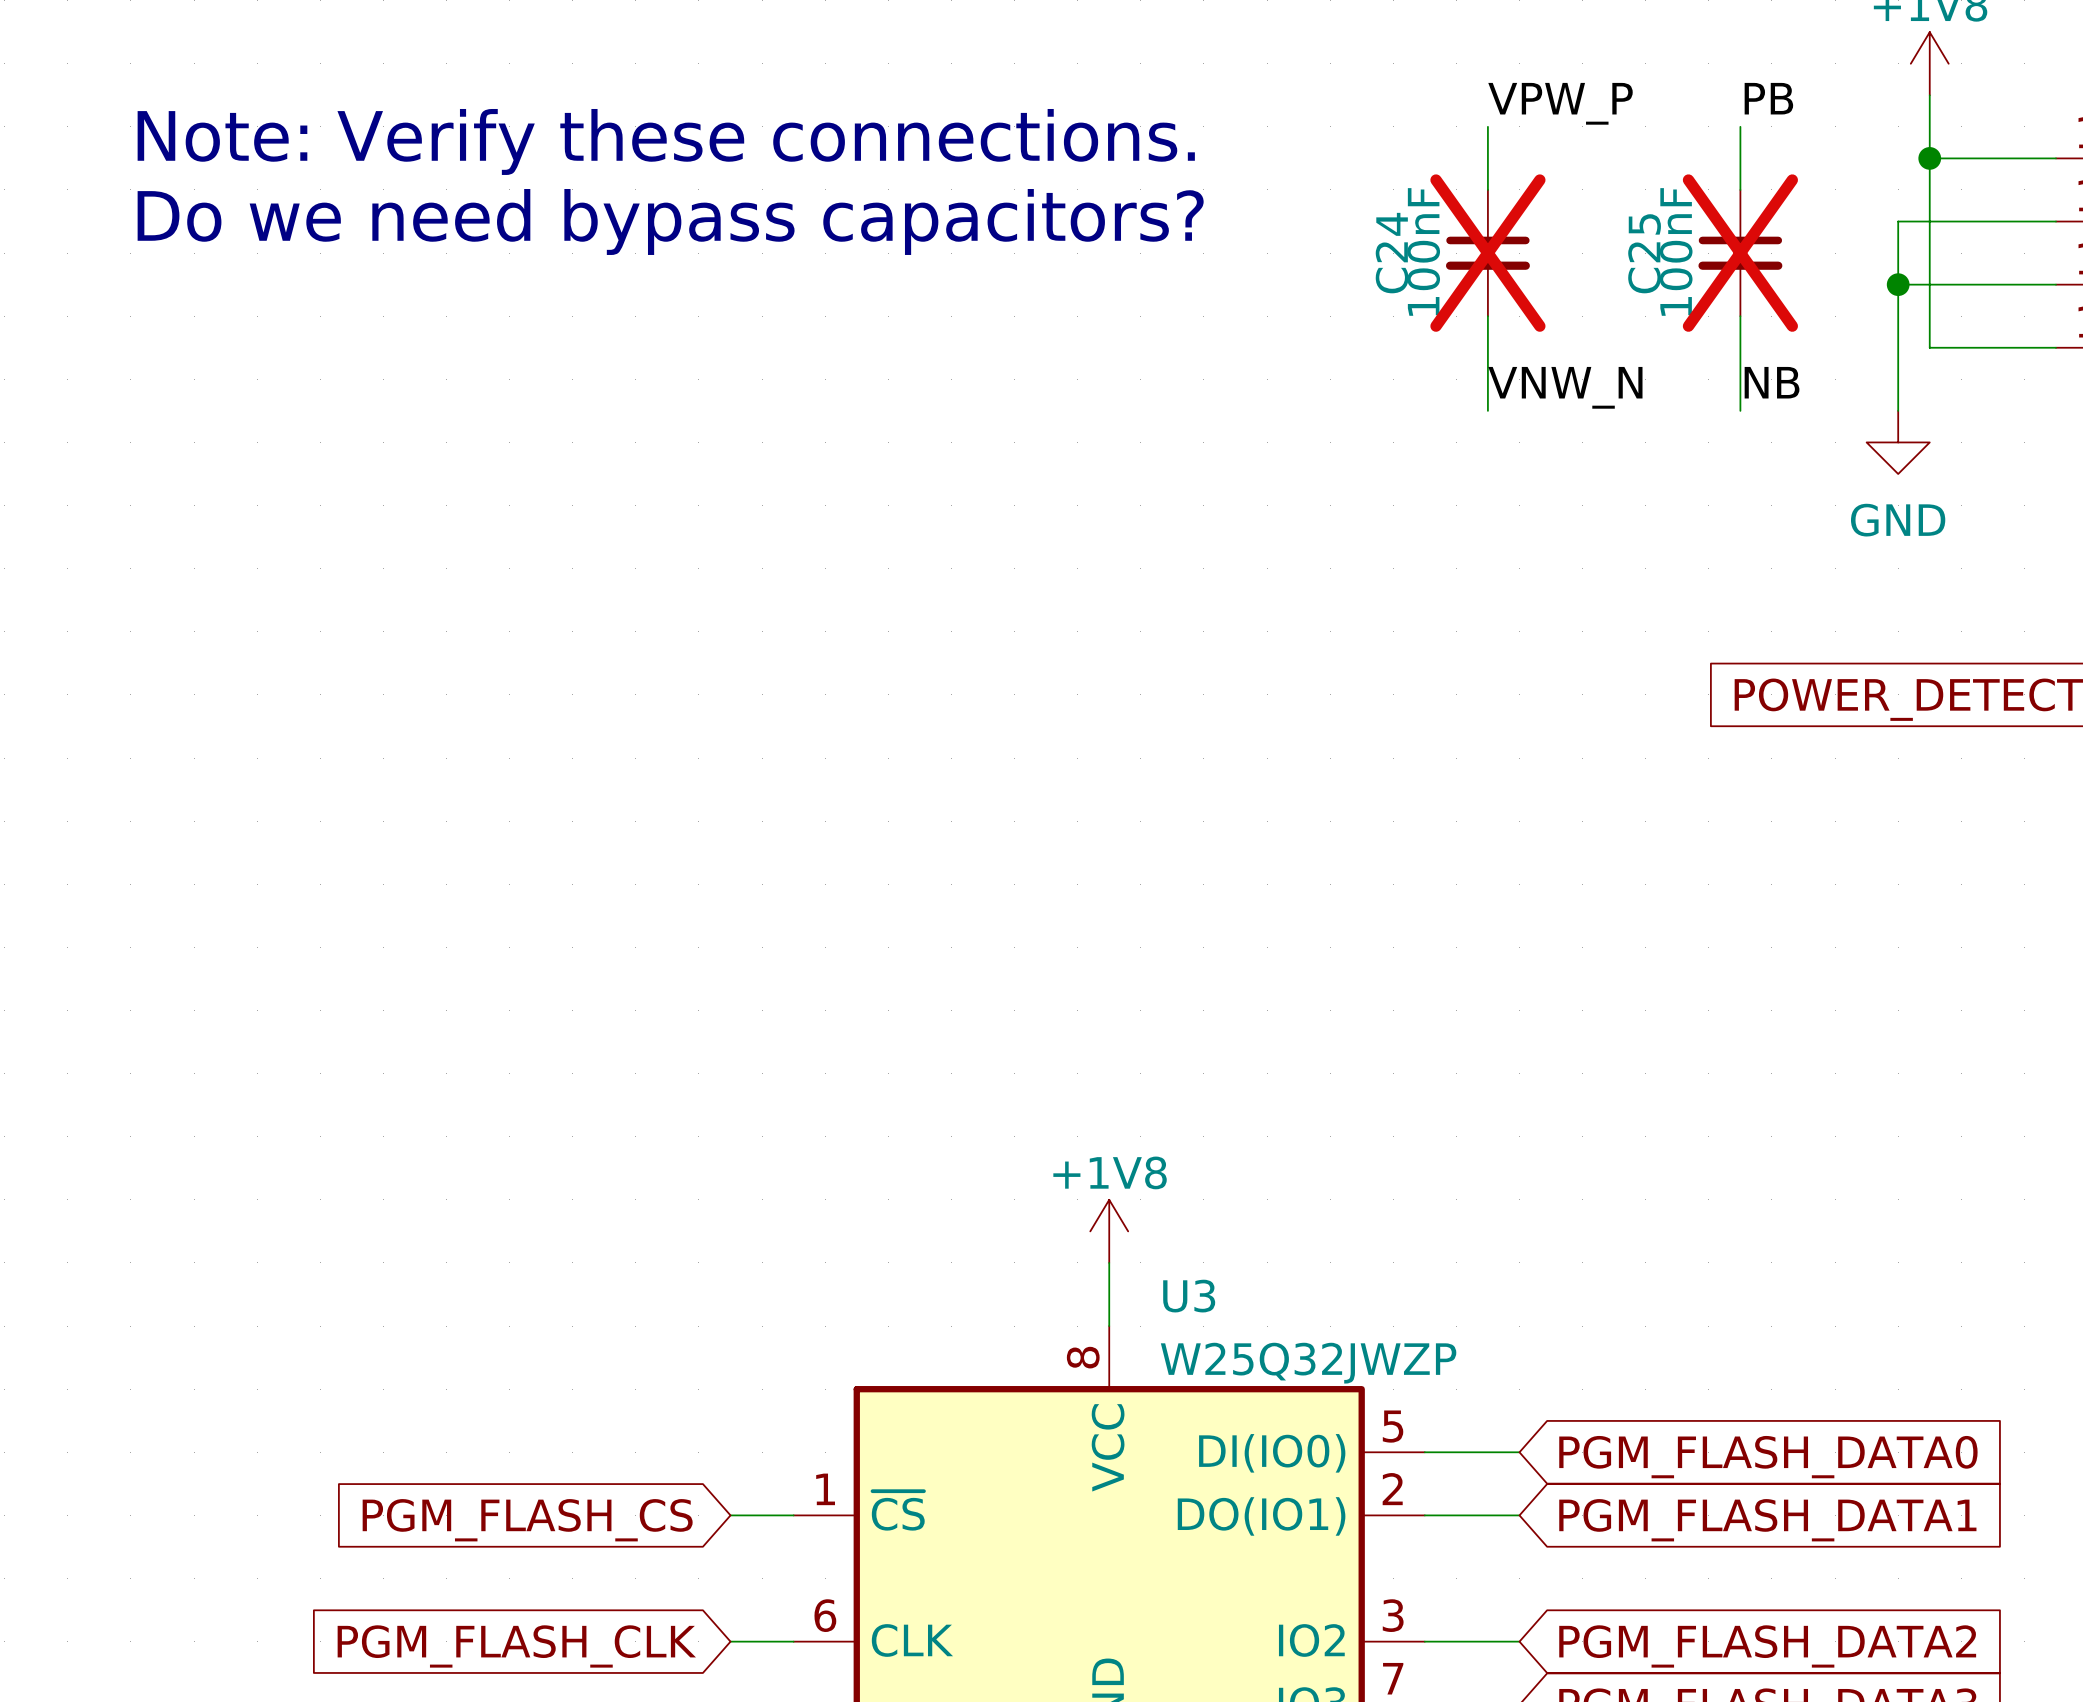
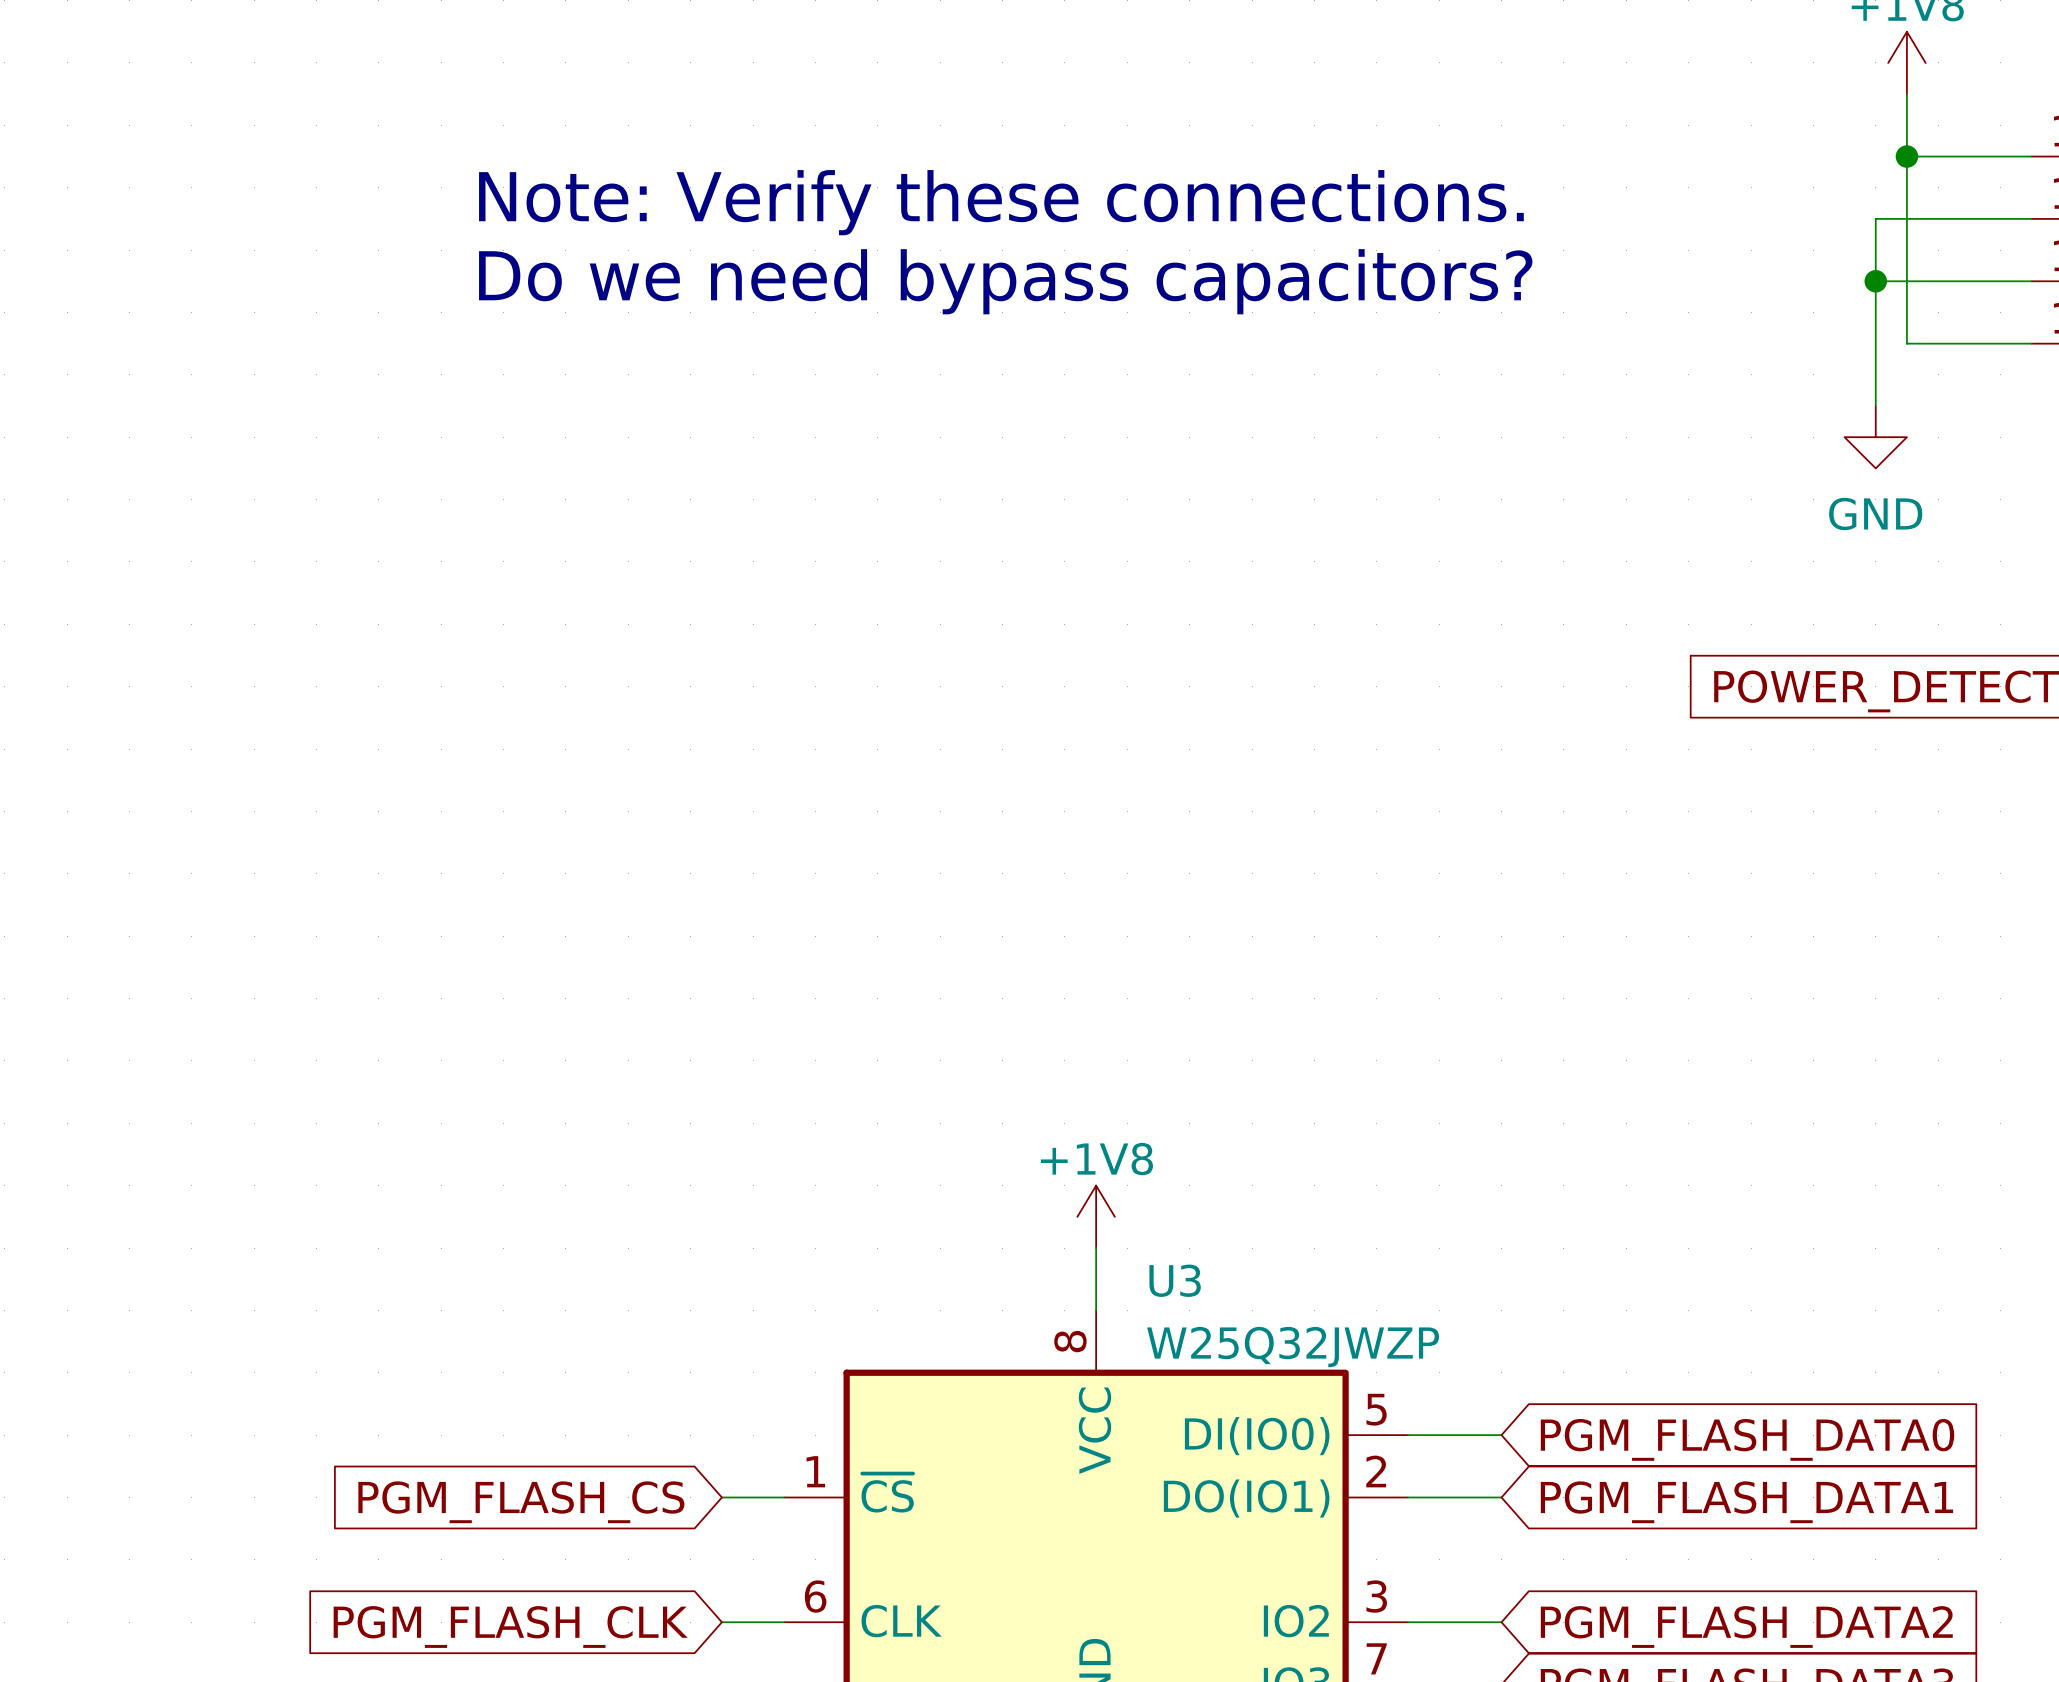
label: PB (1768, 98) -> none
label: VPW_P (1560, 103) -> none
wire: (1487, 126) (1487, 189) -> none
wire: (1740, 126) (1740, 189) -> none
text position: Note: Verify these connections. (666, 141) -> Note: Verify these connections. (1001, 202)
text position: Do we need bypass capacitors? (670, 221) -> Do we need bypass capacitors? (1005, 281)
C24: 100nF (1487, 253) -> none
C25: 100nF (1740, 253) -> none
wire: (1487, 316) (1487, 410) -> none
wire: (1740, 316) (1740, 410) -> none
label: NB (1772, 382) -> none
label: VNW_N (1565, 387) -> none

